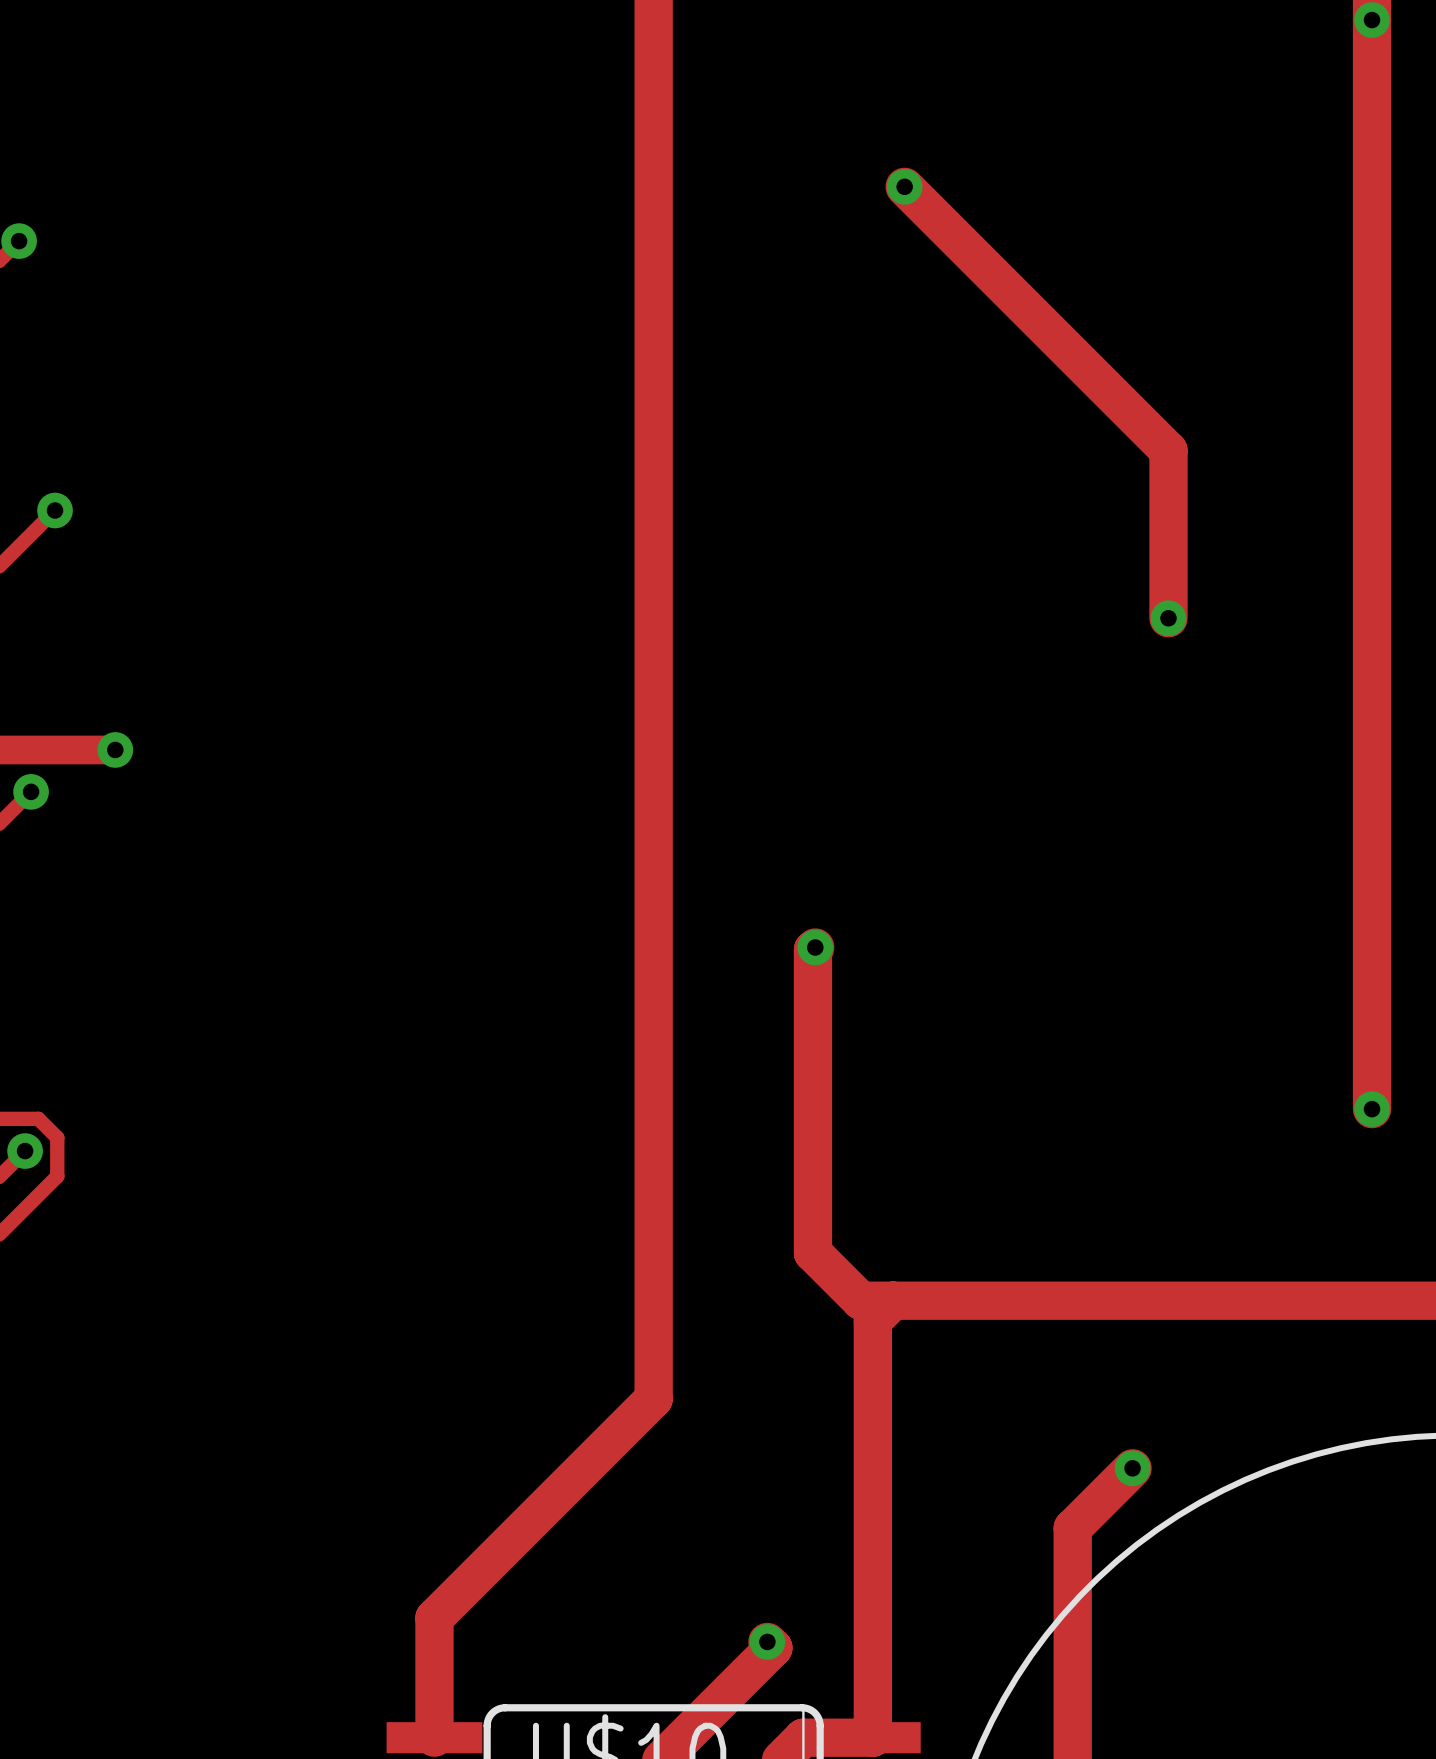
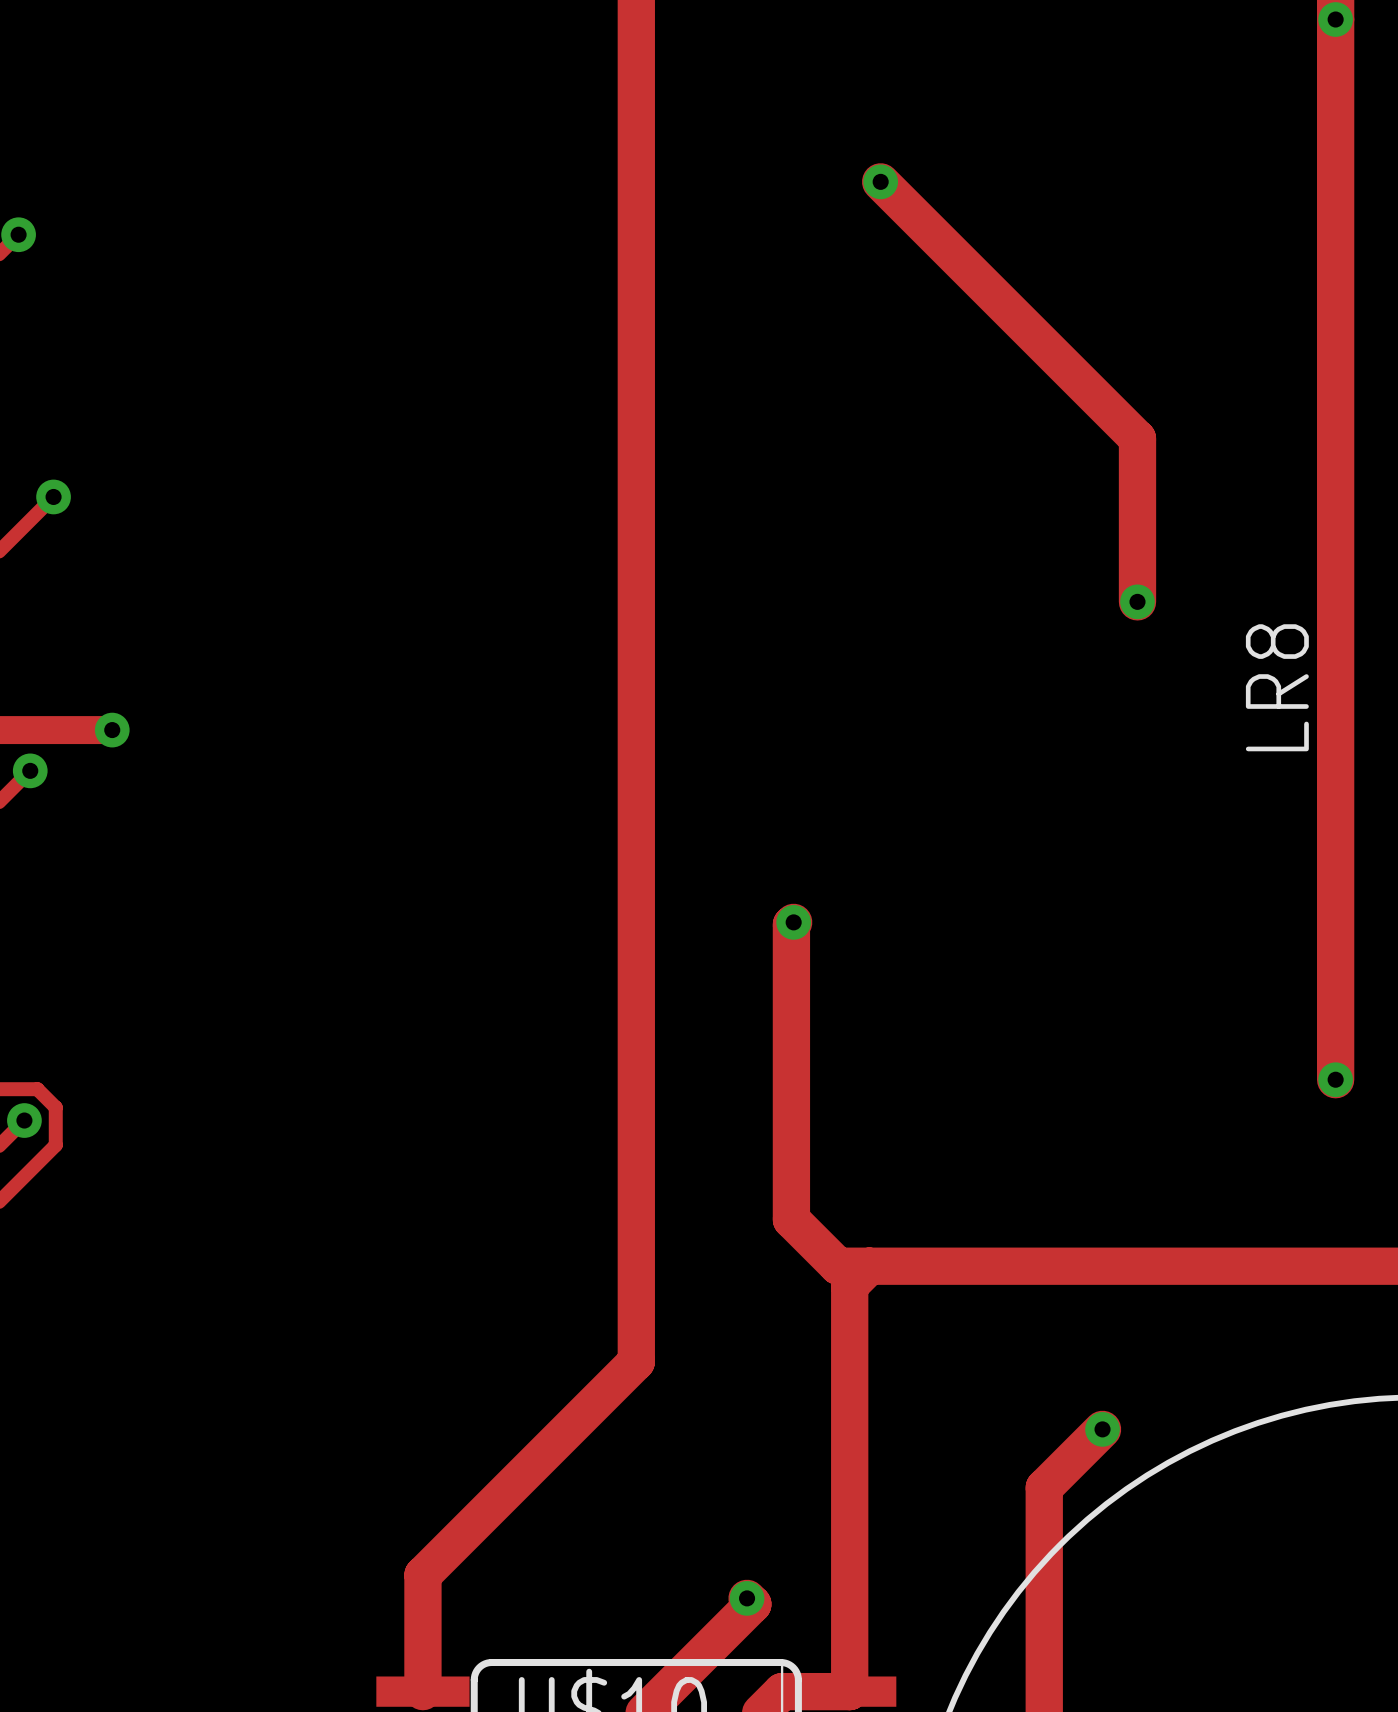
part: none -> LR8 (1277, 687)

